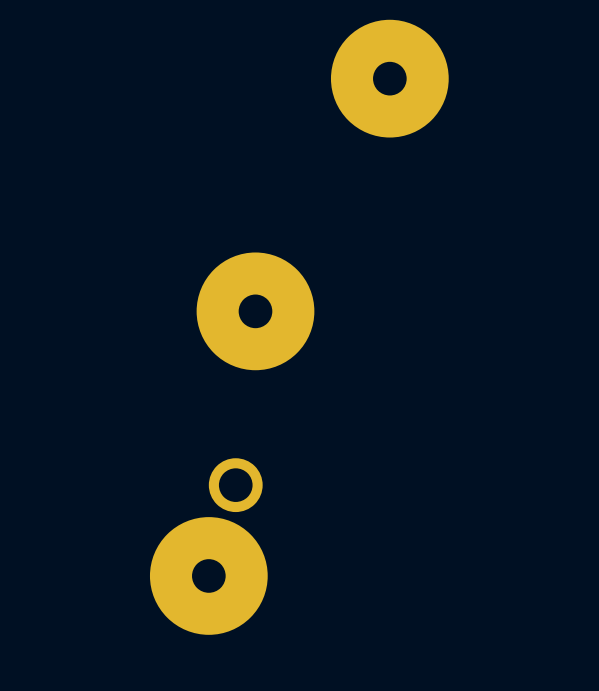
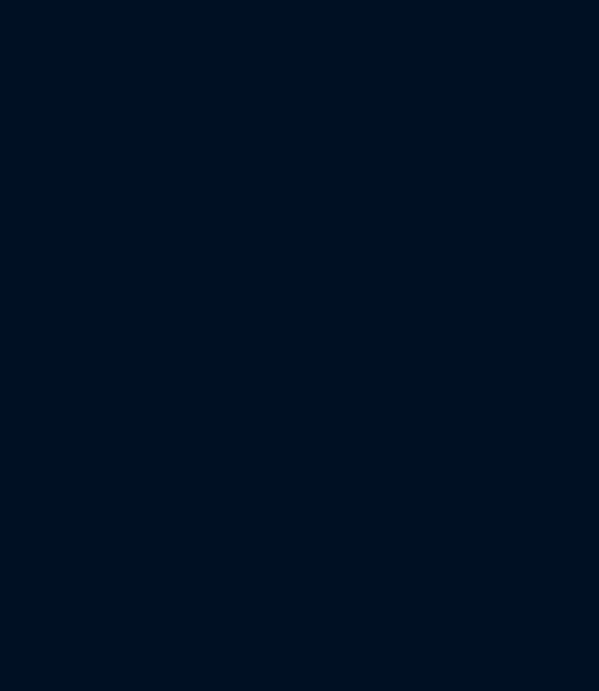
part: (389, 78) -> none
part: (255, 311) -> none
part: (235, 485) -> none
part: (208, 575) -> none

